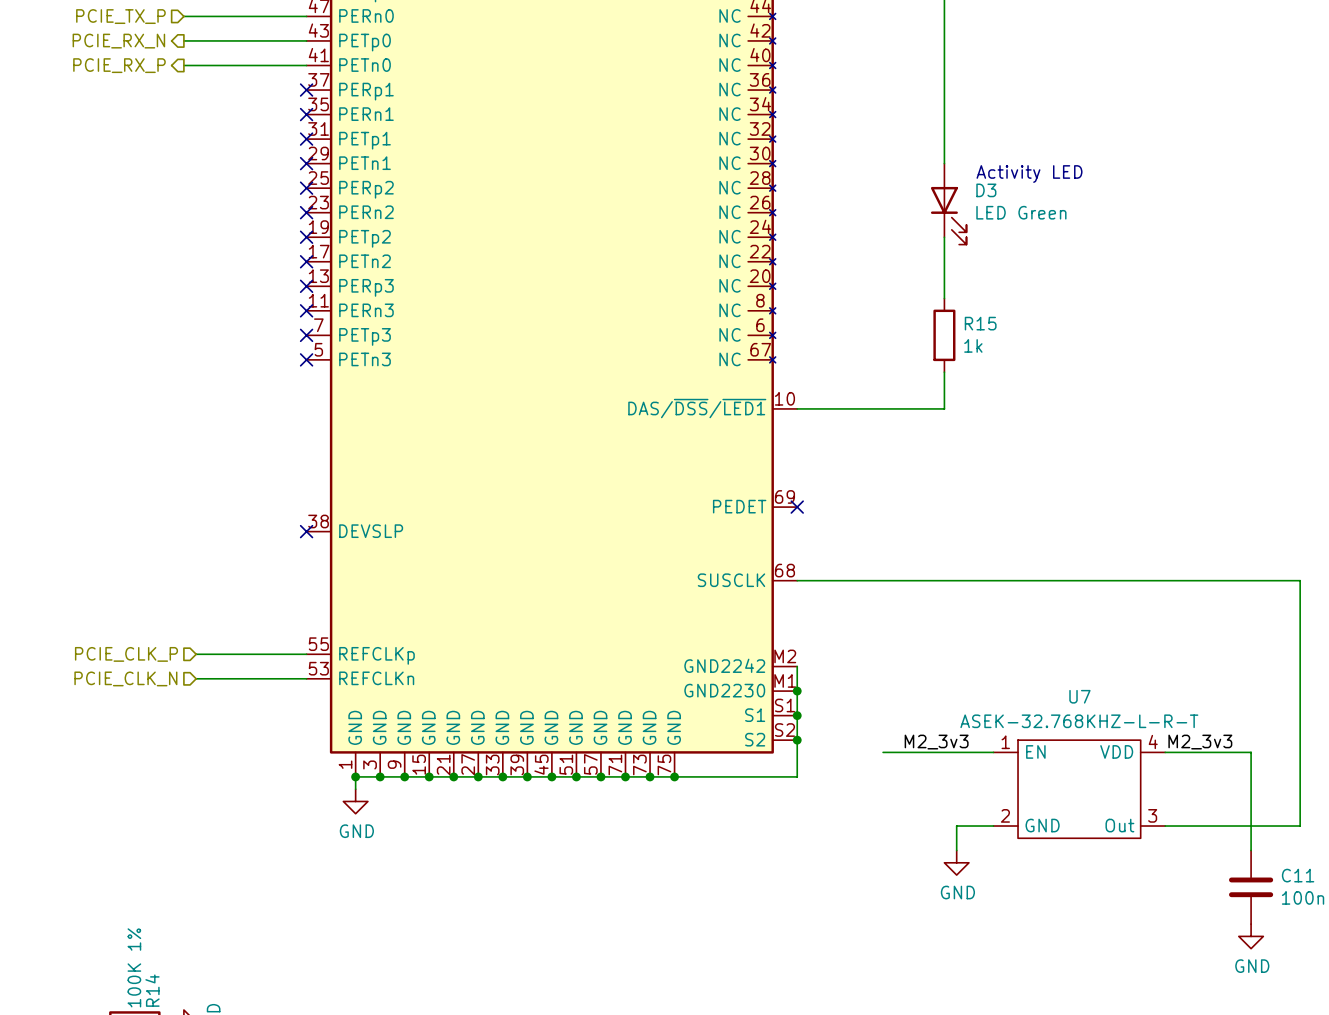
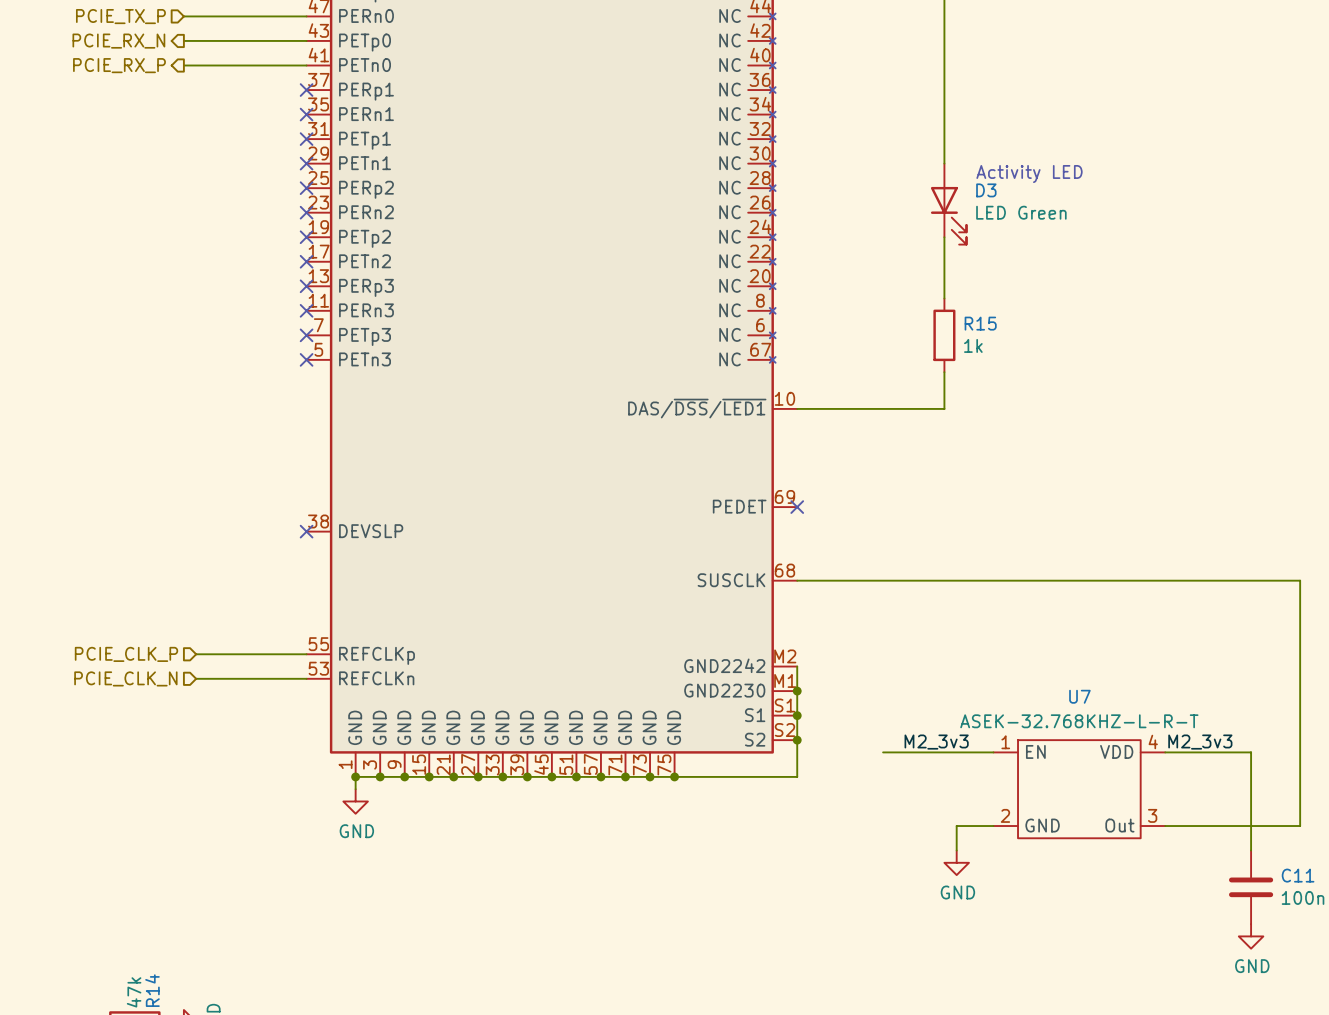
R14 value: 100K 1% (134, 967) -> 47k (134, 992)

